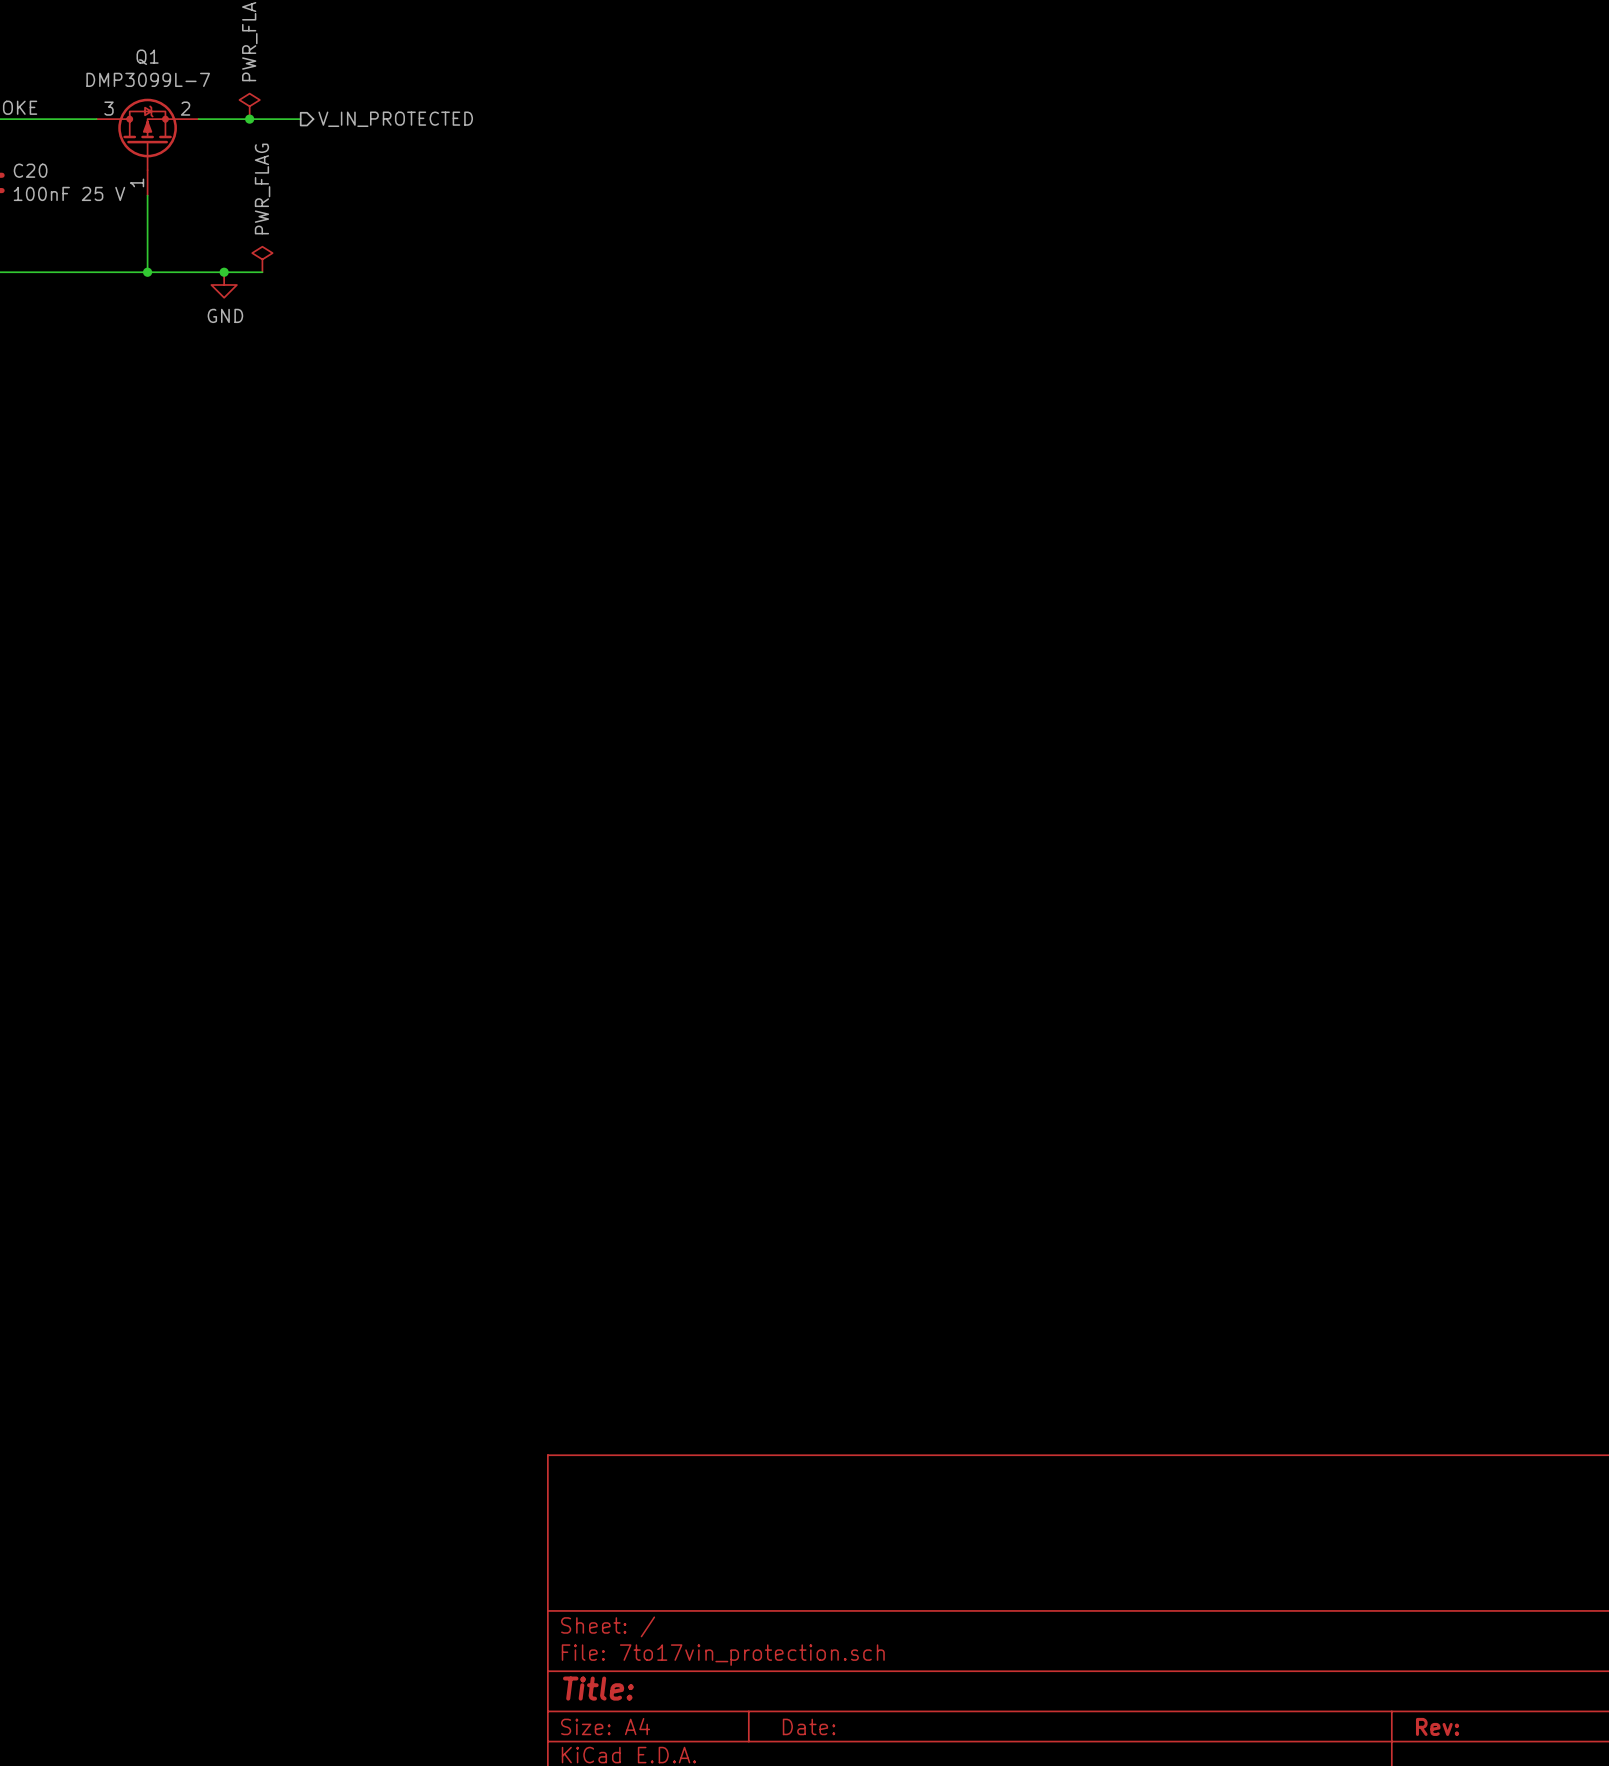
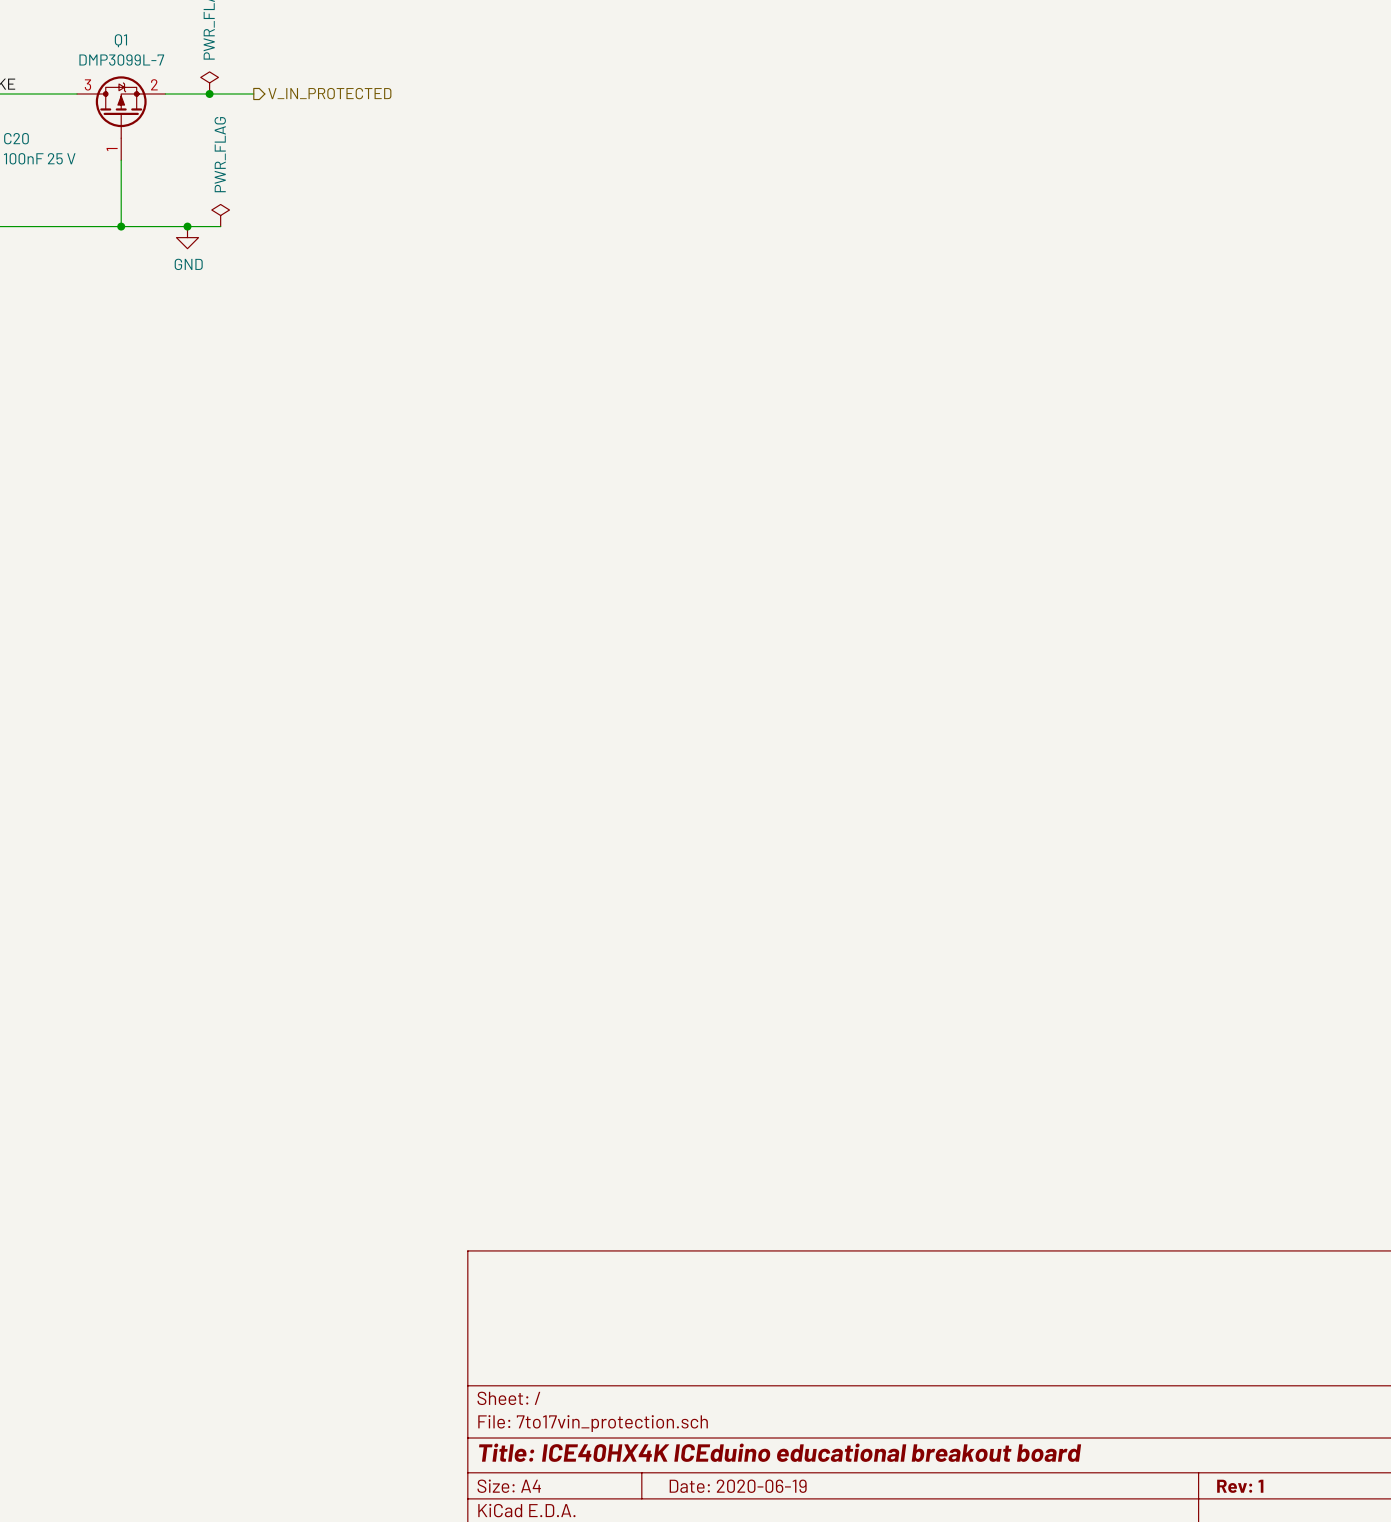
title block: Title: (598, 1688) -> Title: ICE40HX4K ICEduino educational breakout board (780, 1452)
title block: Date: (809, 1726) -> Date: 2020-06-19 (738, 1486)
title block: Rev: (1437, 1726) -> Rev: 1 (1240, 1486)

